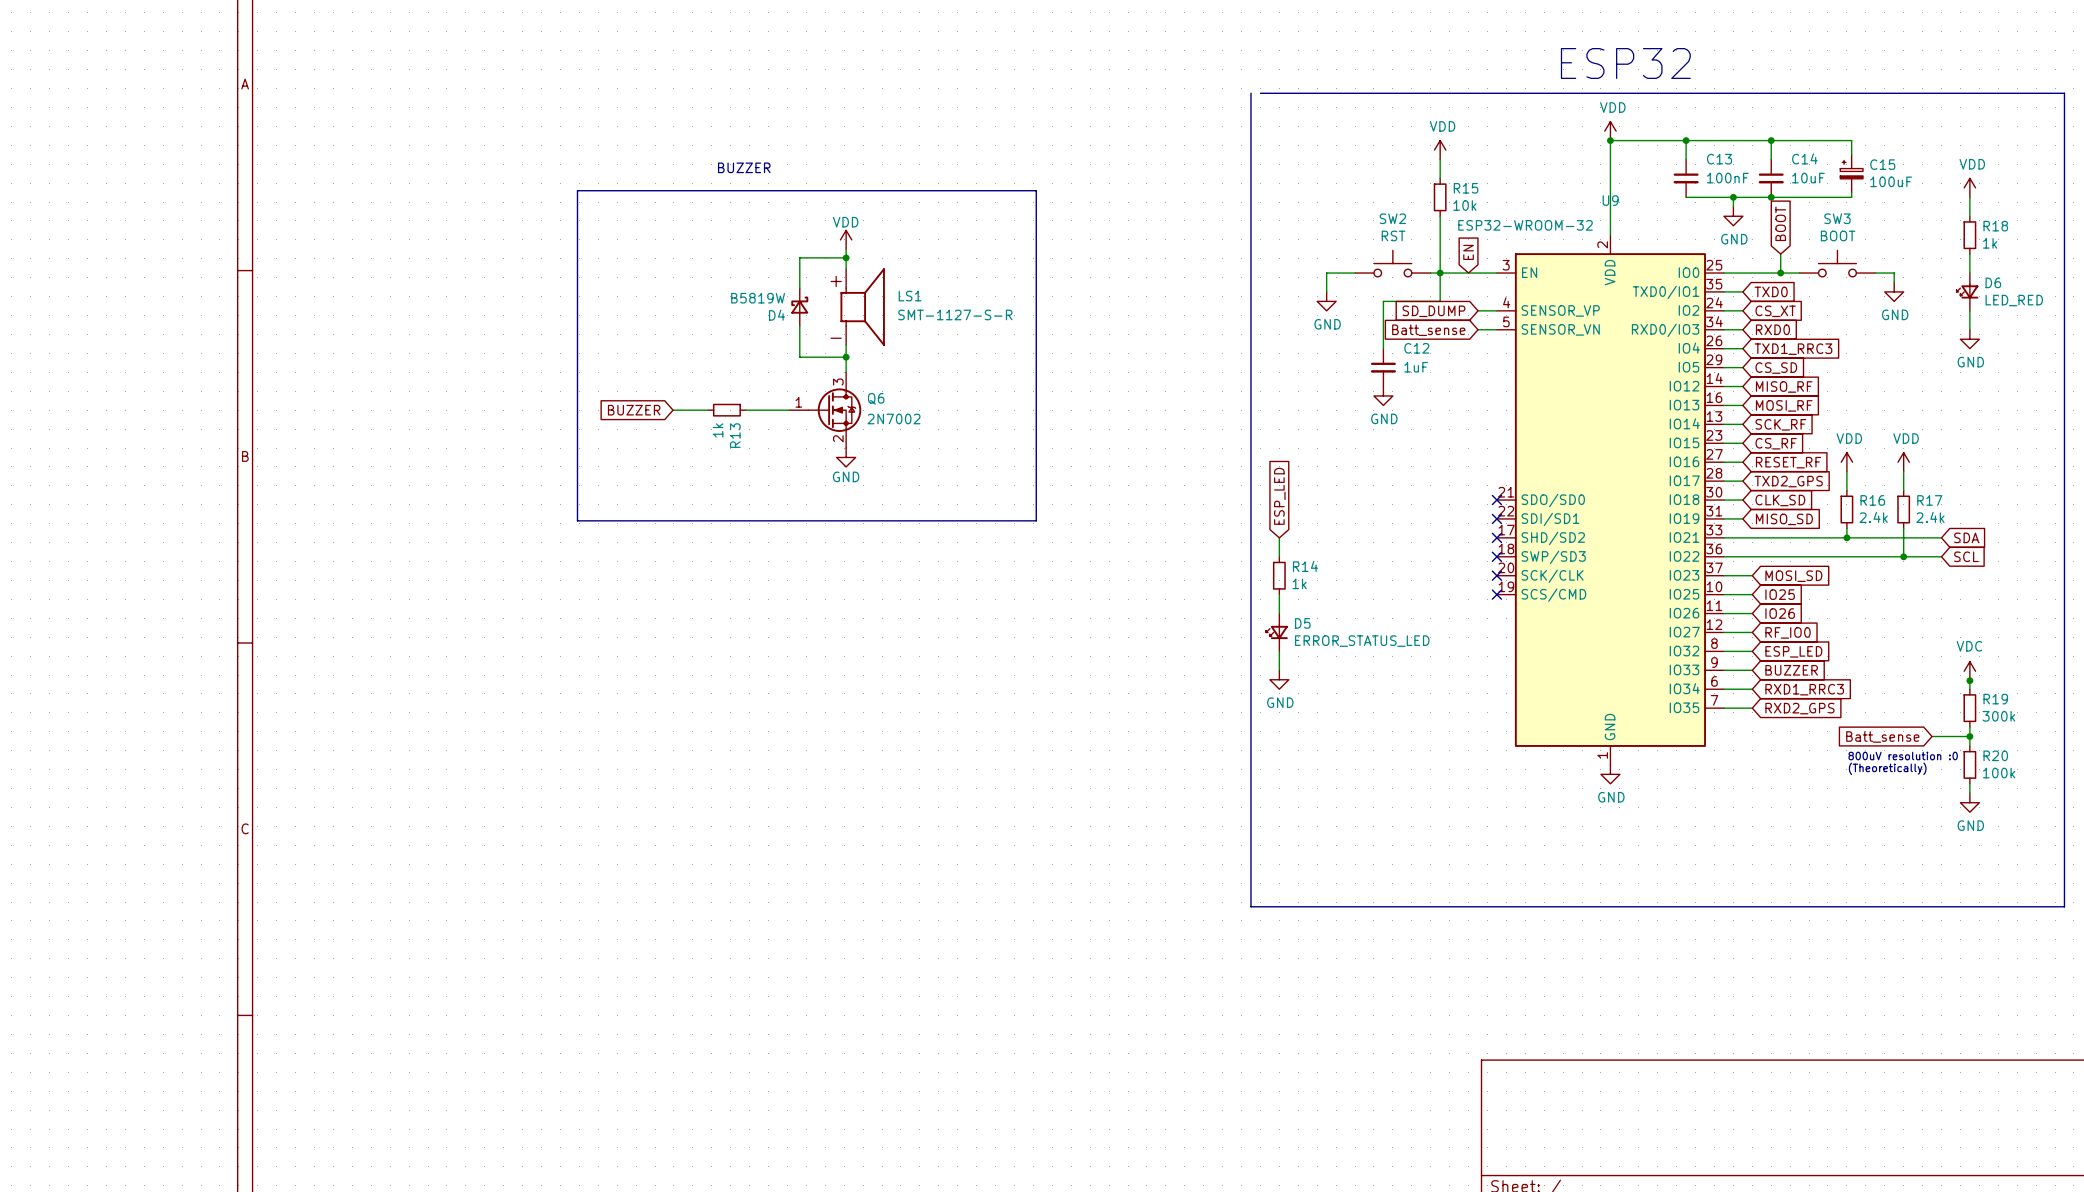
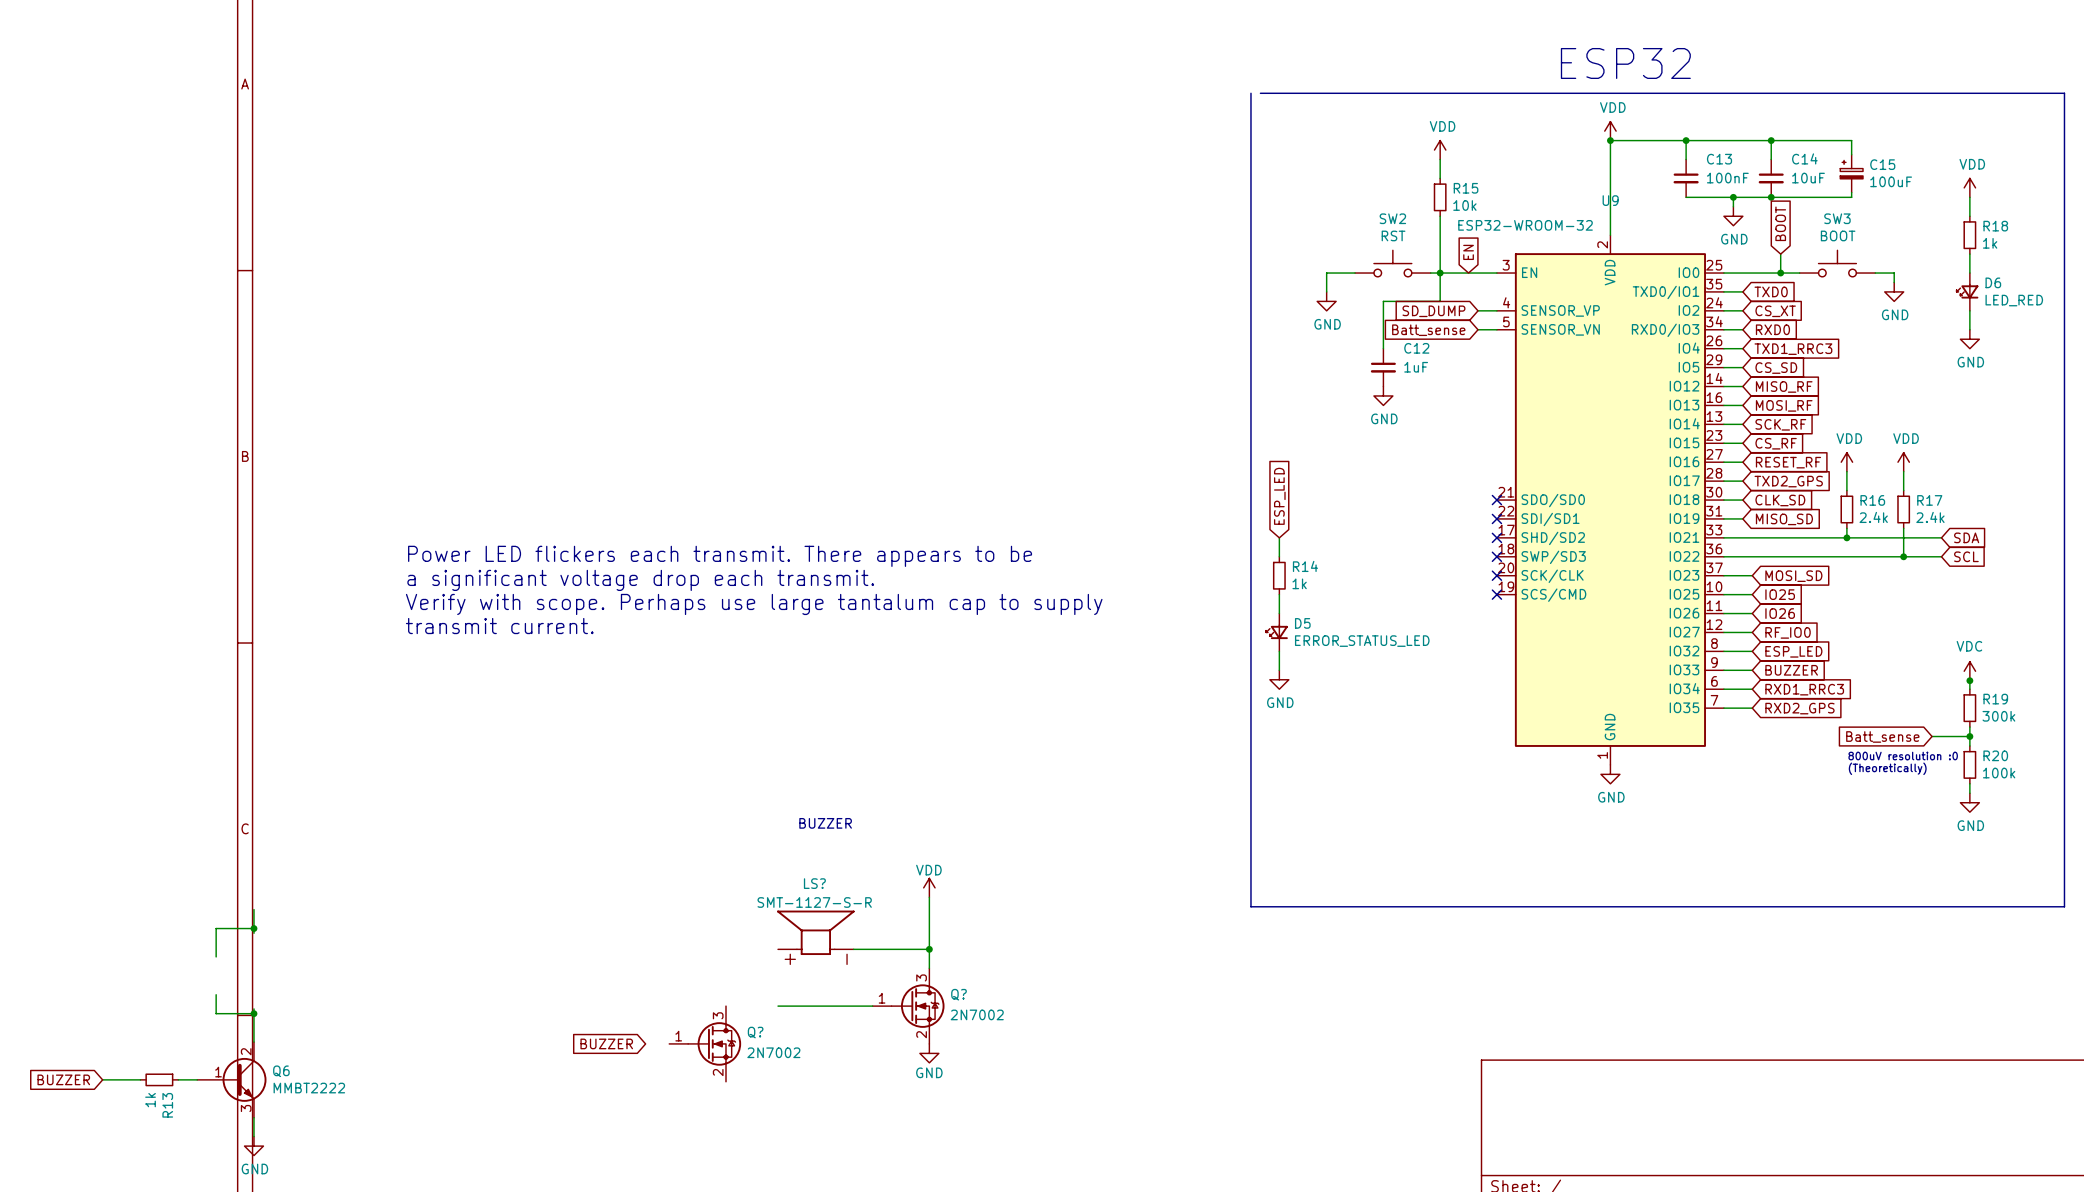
text: BUZZER (744, 167) -> none
line: (577, 190) (1036, 190) (1036, 520) (577, 520) (577, 190) -> none
power symbol: VDD (846, 239) -> none
wire: (846, 249) (846, 269) -> none
wire: (846, 257) (799, 257) (799, 288) -> none
junction: (846, 257) -> none
D4: B5819W (799, 307) -> none
LS1: SMT-1127-S-R (862, 307) -> none
wire: (799, 325) (799, 357) (846, 357) -> none
wire: (846, 344) (846, 372) -> none
junction: (846, 357) -> none
Q6 symbol: [789, 372, 862, 449] -> [197, 1042, 267, 1118]
global label: BUZZER (634, 410) -> none
wire: (673, 410) (708, 410) -> none
R13 position: (726, 410) -> (159, 1079)
wire: (745, 410) (789, 410) -> none
Q6 value: 2N7002 (893, 418) -> MMBT2222 (309, 1088)
power symbol: GND (846, 457) -> none
text: none -> Power LED flickers each transmit. There appears to be (720, 556)
text: none -> a significant voltage drop each transmit. (640, 580)
text: none -> Verify with scope. Perhaps use large tantalum cap to supply (754, 604)
text: none -> transmit current. (499, 626)
text: none -> BUZZER (825, 823)
power symbol: none -> VDD (929, 887)
wire: none -> (929, 897) (929, 968)
wire: none -> (253, 909) (253, 933)
wire: none -> (253, 928) (216, 928) (216, 956)
junction: none -> (253, 928)
LS?: none -> SMT-1127-S-R (815, 932)
wire: none -> (853, 949) (929, 949)
junction: none -> (929, 949)
wire: none -> (216, 994) (216, 1013) (253, 1013)
wire: none -> (778, 1006) (872, 1006)
Q?: none -> 2N7002 (908, 1006)
wire: none -> (253, 1008) (253, 1042)
junction: none -> (253, 1013)
global label: none -> BUZZER (606, 1043)
Q?: none -> 2N7002 (705, 1043)
power symbol: none -> GND (929, 1053)
global label: none -> BUZZER (63, 1079)
wire: none -> (102, 1079) (140, 1079)
wire: none -> (178, 1079) (197, 1079)
wire: none -> (253, 1117) (253, 1136)
power symbol: none -> GND (253, 1146)

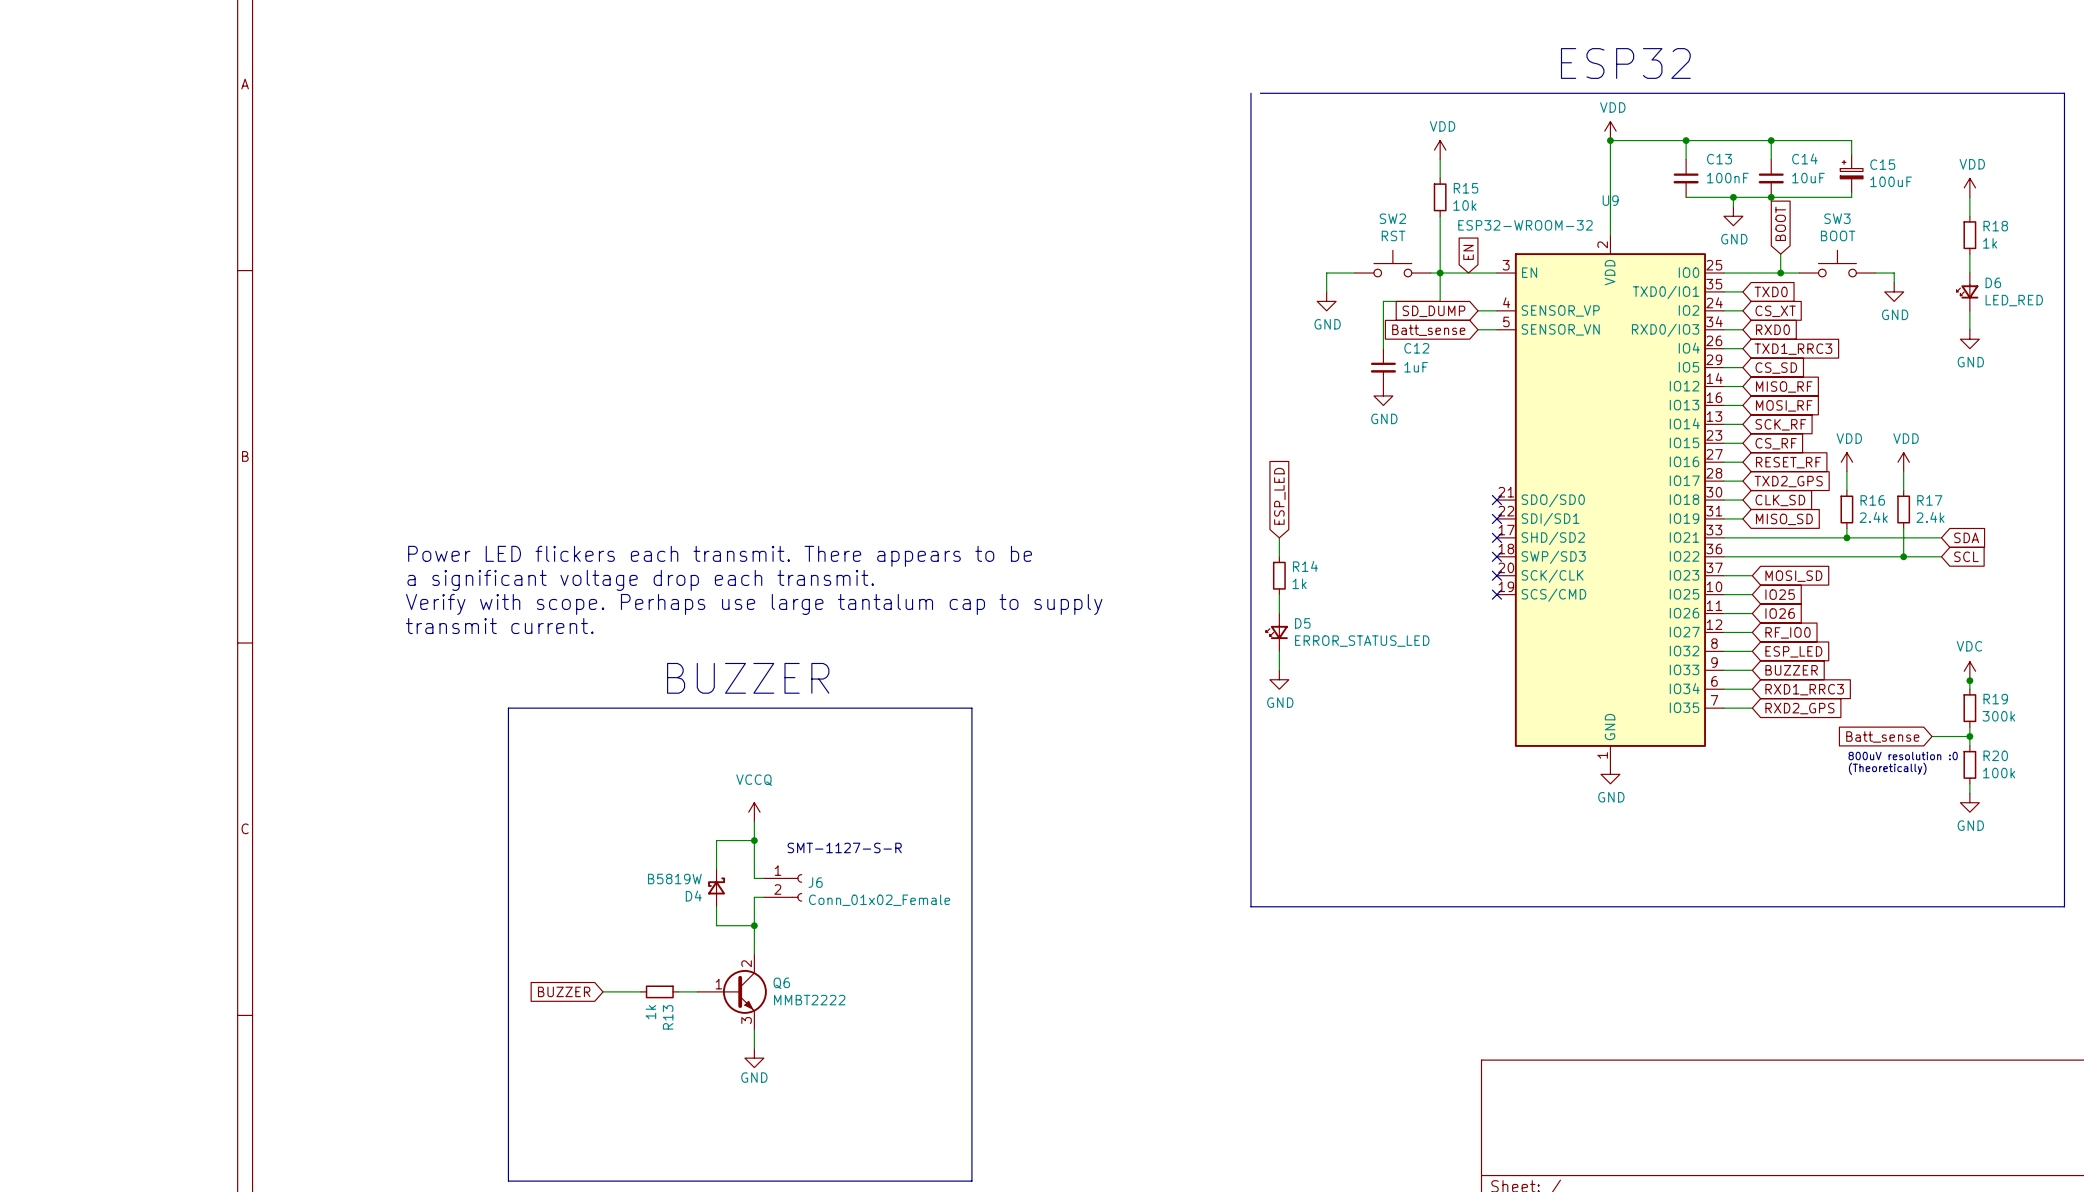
text: none -> BUZZER (748, 678)
line: none -> (508, 708) (508, 1181) (971, 1181) (971, 708) (508, 708)
power symbol: none -> VCCQ (754, 812)
wire: none -> (754, 821) (754, 878) (763, 878)
text: BUZZER (825, 823) -> none
wire: none -> (754, 840) (716, 840) (716, 868)
junction: none -> (754, 840)
text: none -> SMT-1127-S-R (844, 847)
D4: none -> B5819W (716, 887)
J6: none -> Conn_01x02_Female (783, 887)
power symbol: VDD (929, 887) -> none
wire: none -> (763, 897) (754, 897) (754, 954)
wire: (929, 897) (929, 968) -> none
wire: none -> (716, 906) (716, 925) (754, 925)
wire: (253, 909) (253, 933) -> none
junction: none -> (754, 925)
wire: (253, 928) (216, 928) (216, 956) -> none
junction: (253, 928) -> none
LS?: SMT-1127-S-R (815, 932) -> none
wire: (853, 949) (929, 949) -> none
junction: (929, 949) -> none
wire: none -> (603, 991) (640, 991)
wire: none -> (678, 991) (697, 991)
wire: (216, 994) (216, 1013) (253, 1013) -> none
wire: (778, 1006) (872, 1006) -> none
Q?: 2N7002 (908, 1006) -> none
wire: (253, 1008) (253, 1042) -> none
junction: (253, 1013) -> none
wire: none -> (754, 1029) (754, 1048)
global label position: BUZZER (606, 1043) -> BUZZER (564, 991)
Q?: 2N7002 (705, 1043) -> none
power symbol position: GND (929, 1053) -> GND (754, 1058)
global label: BUZZER (63, 1079) -> none
wire: (102, 1079) (140, 1079) -> none
R13 position: (159, 1079) -> (659, 991)
wire: (178, 1079) (197, 1079) -> none
Q6 position: (231, 1079) -> (732, 991)
wire: (253, 1117) (253, 1136) -> none
power symbol: GND (253, 1146) -> none

